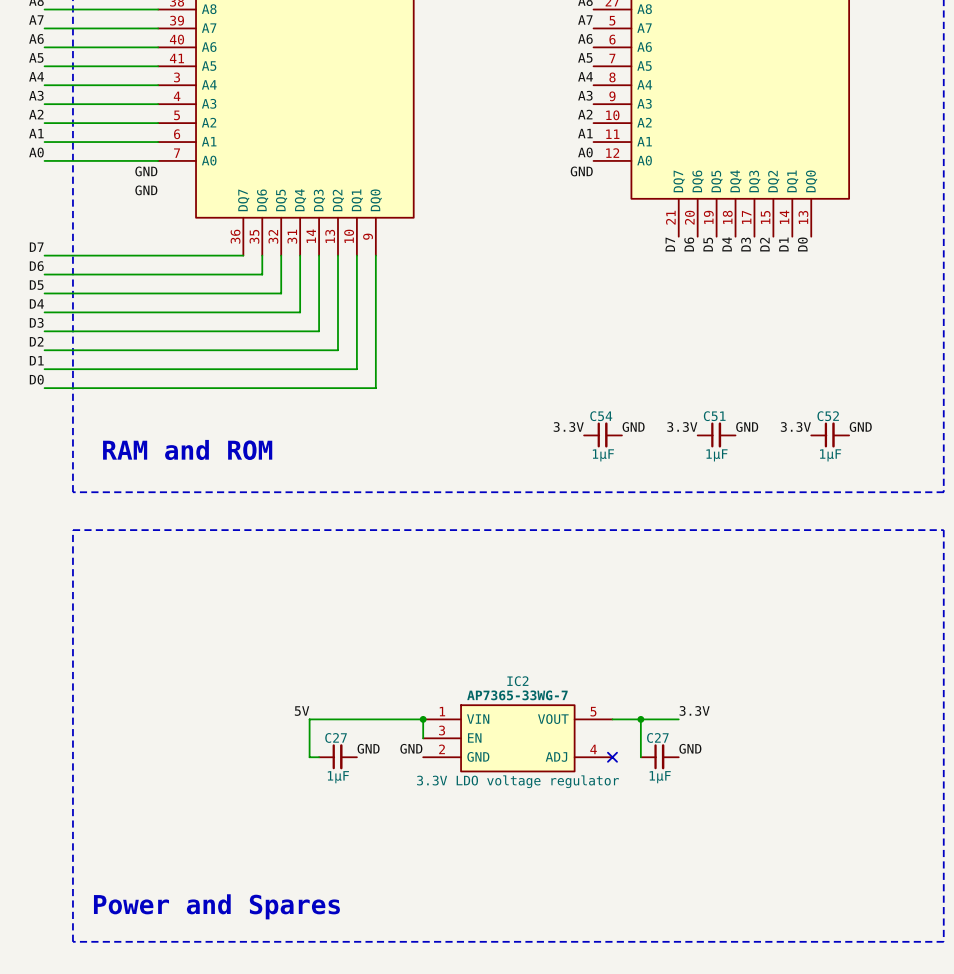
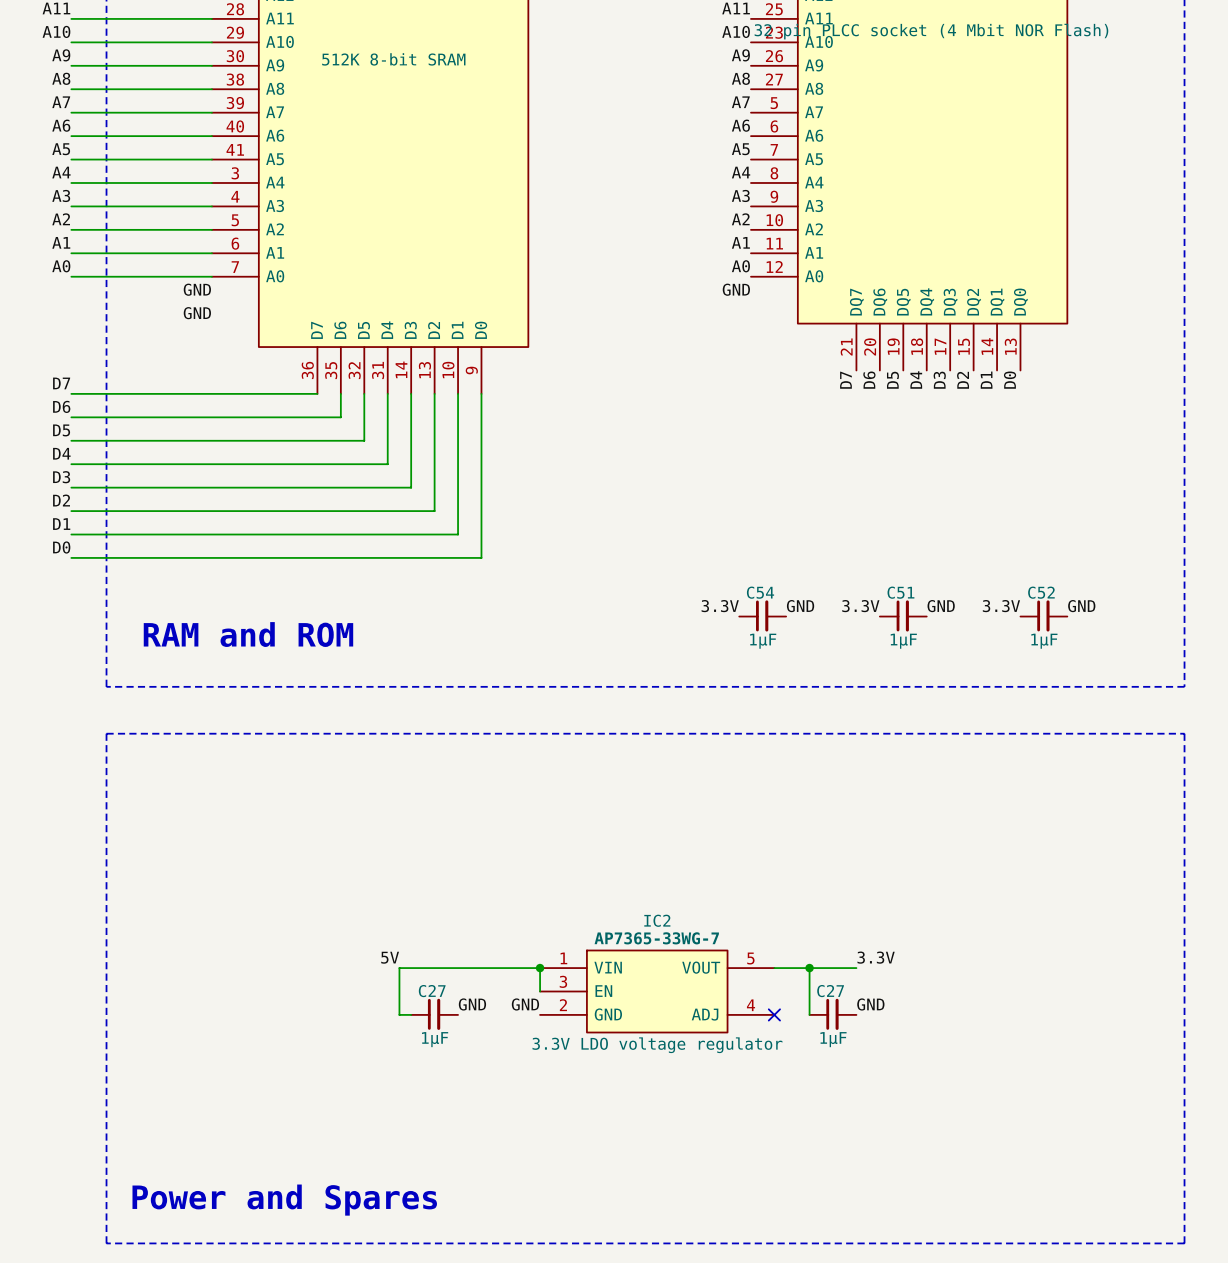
part pin name: DQ7 (243, 200) -> D7 (316, 330)
part pin name: DQ6 (262, 200) -> D6 (340, 330)
part pin name: DQ5 (281, 200) -> D5 (363, 330)
part pin name: DQ4 (300, 200) -> D4 (387, 330)
part pin name: DQ3 (319, 200) -> D3 (410, 330)
part pin name: DQ2 (338, 200) -> D2 (434, 330)
part pin name: DQ1 (357, 200) -> D1 (457, 330)
part pin name: DQ0 (376, 200) -> D0 (481, 330)

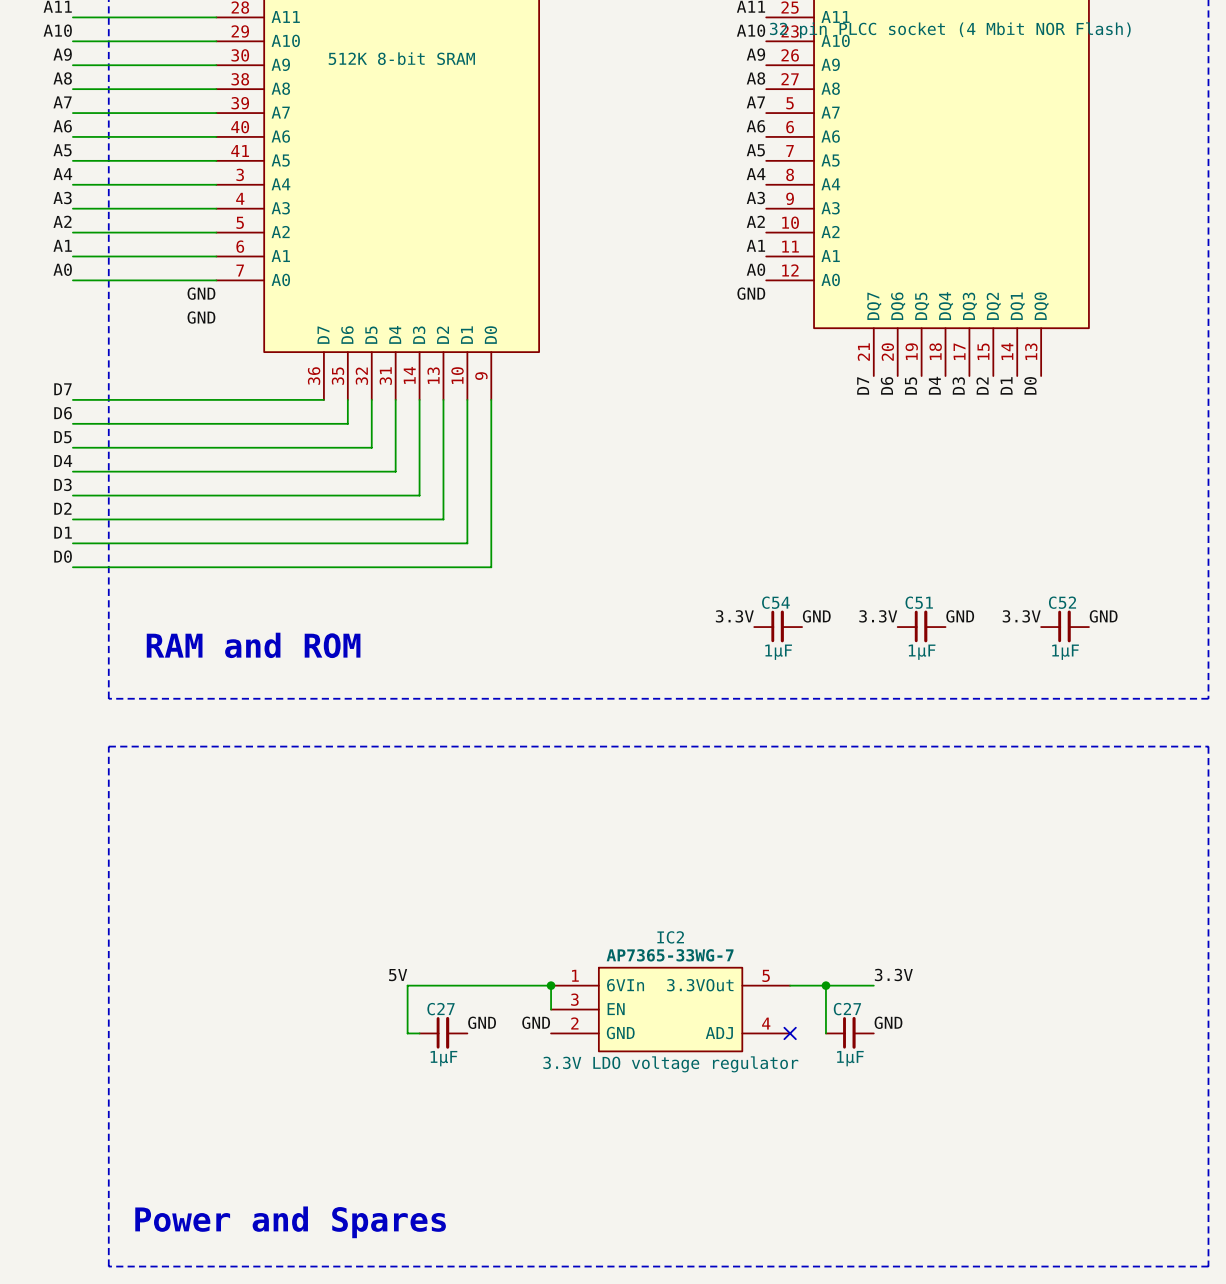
IC2 pin name: VIN (608, 967) -> 6VIn (625, 985)
IC2 pin name: VOUT (701, 967) -> 3.3VOut (700, 985)

